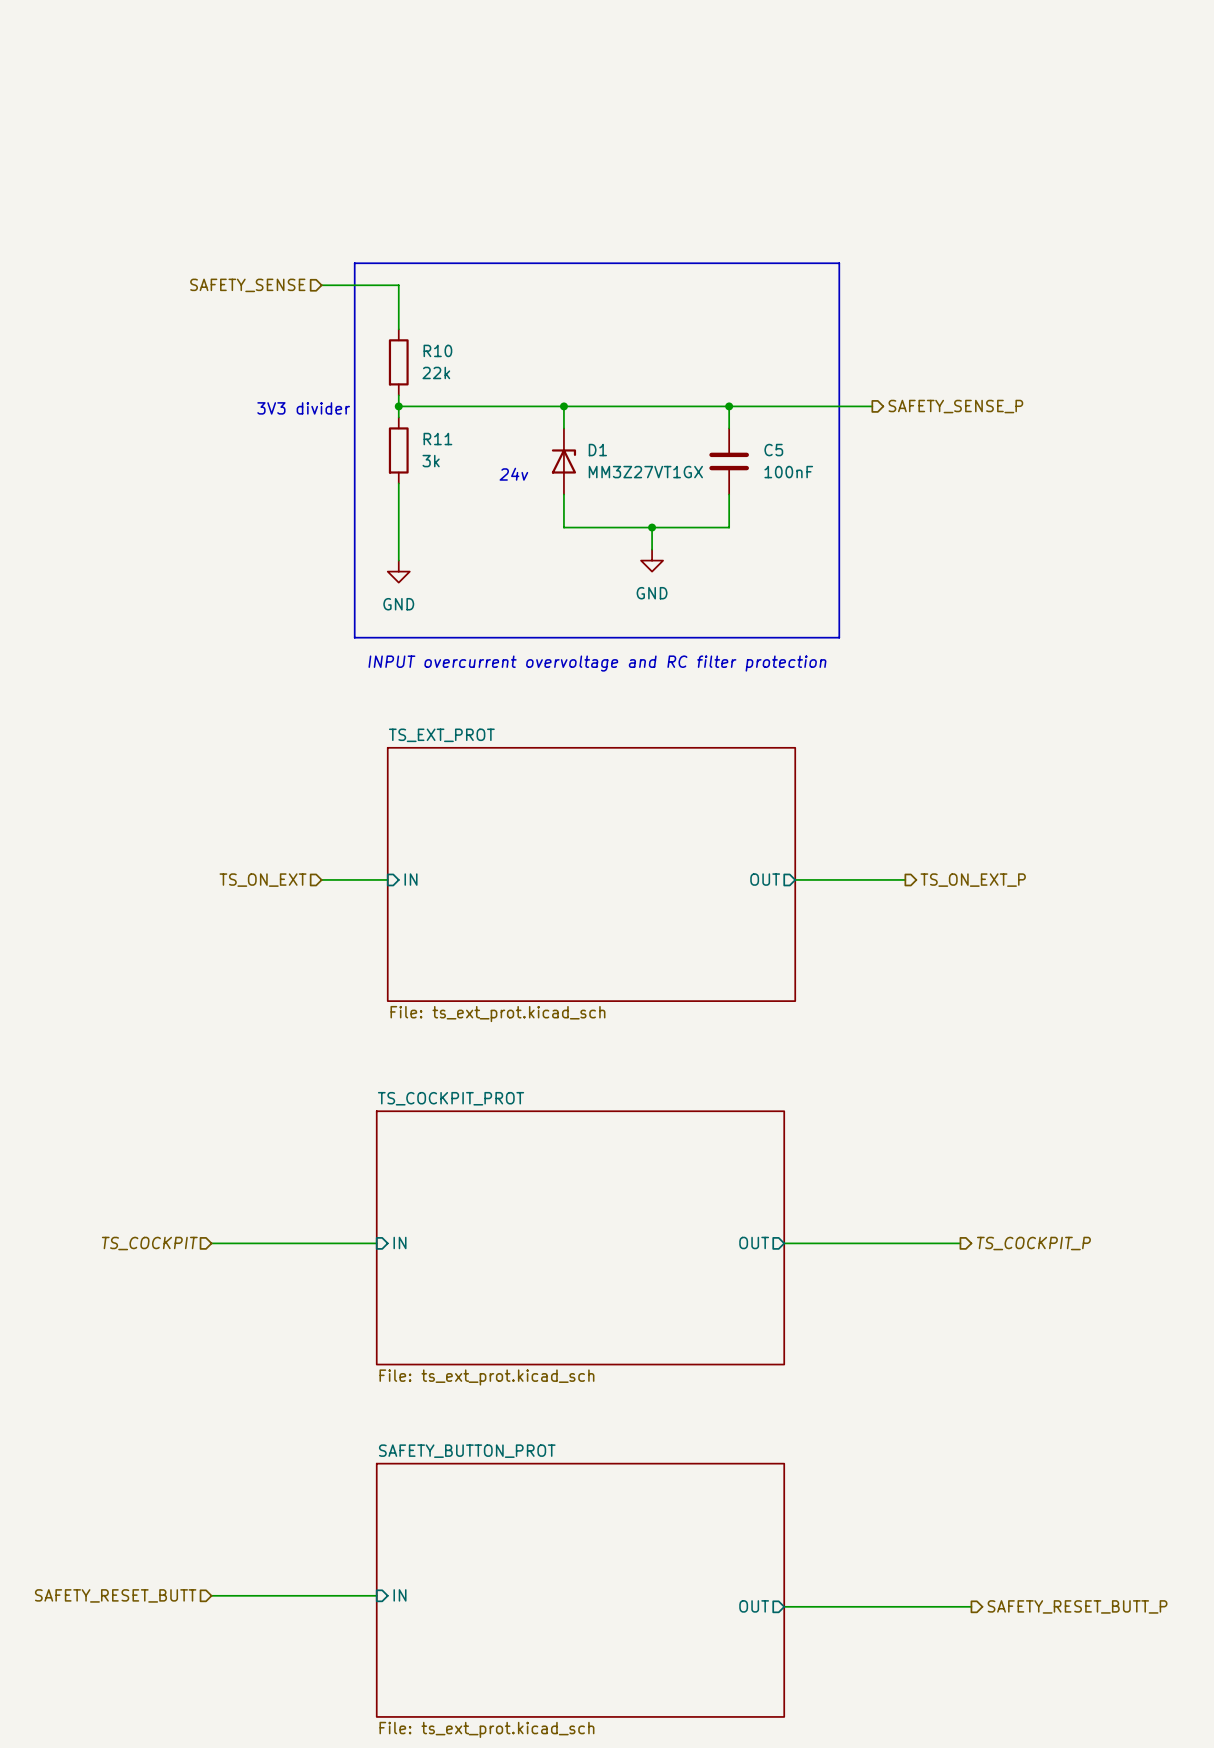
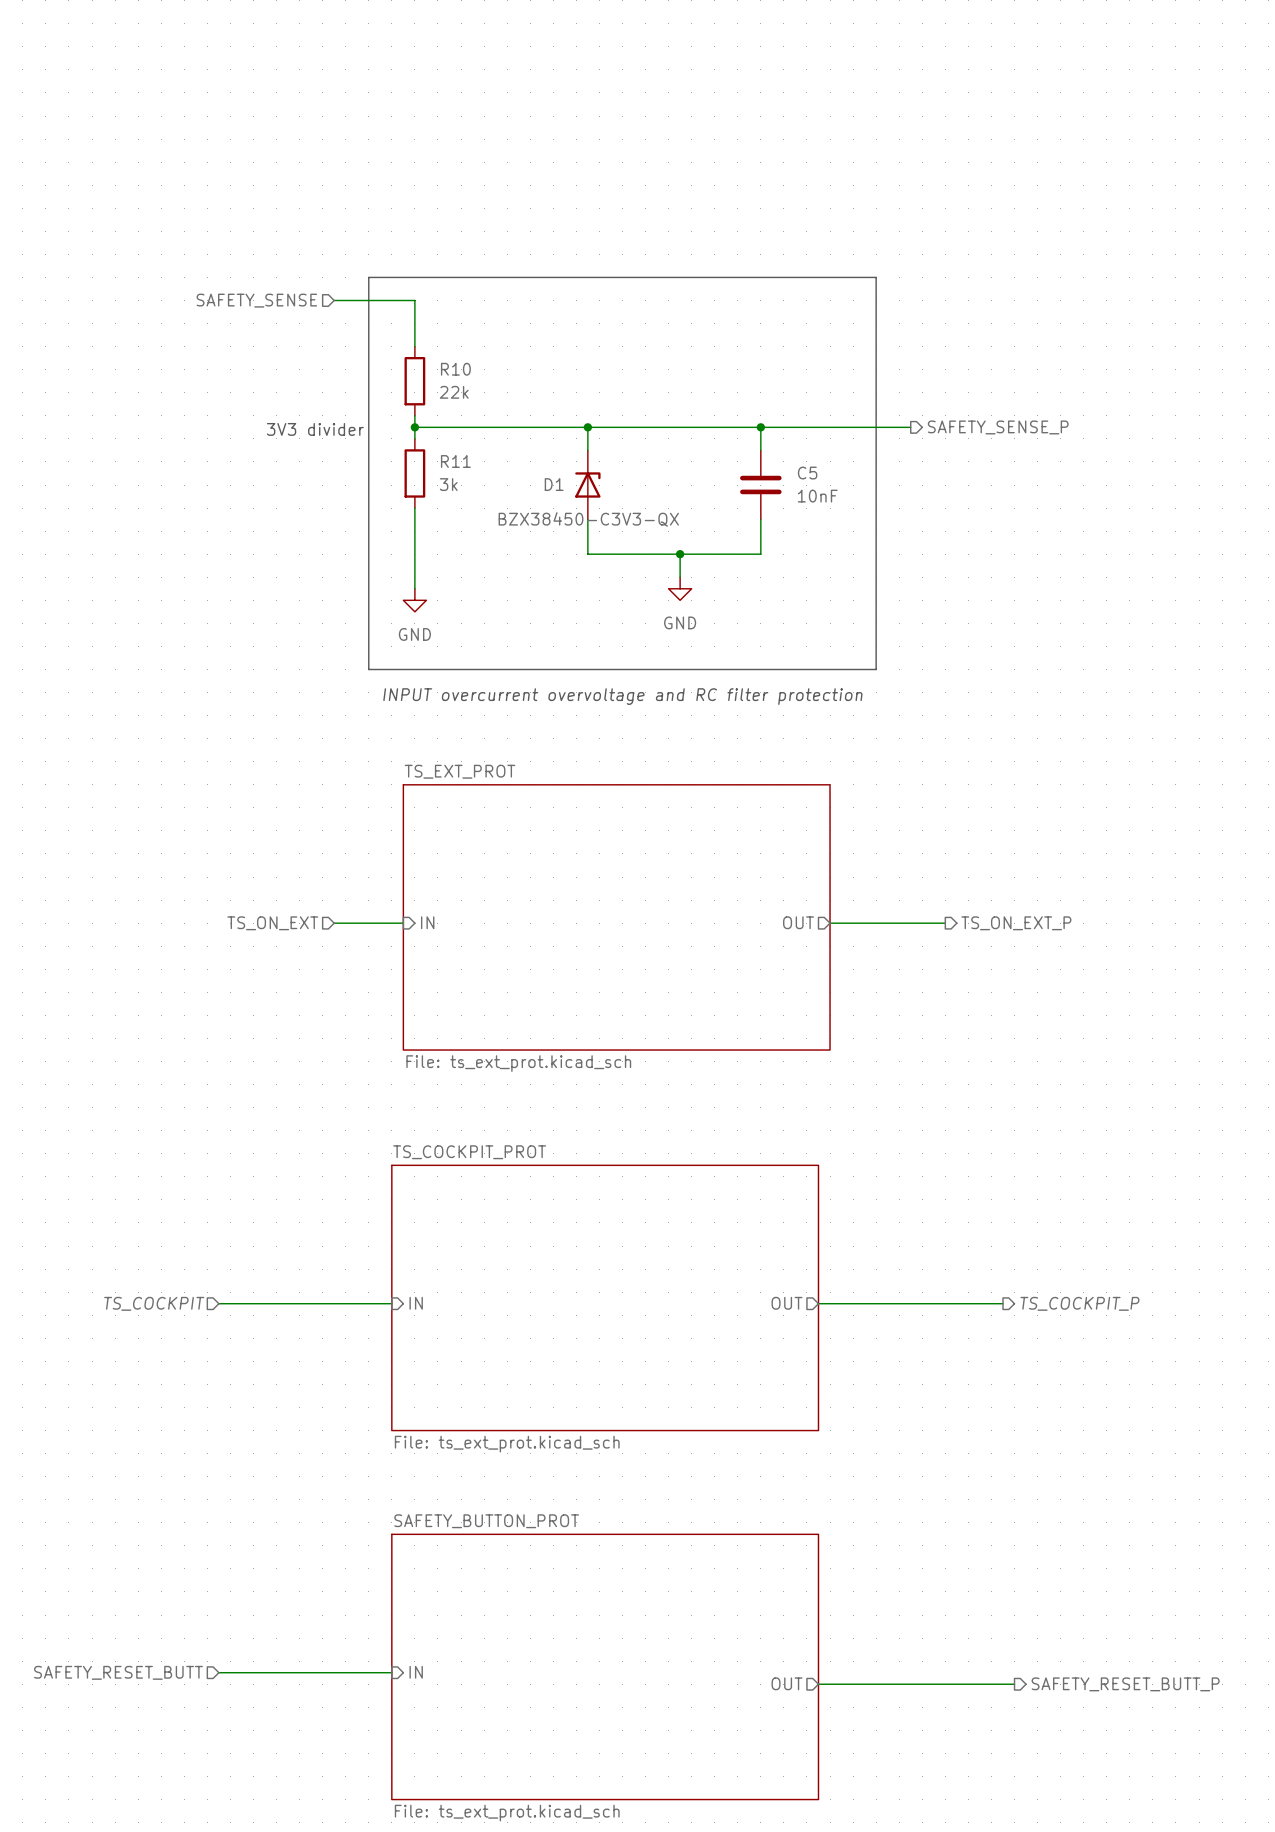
D1 name position: D1 (597, 450) -> D1 (554, 484)
D1 value: MM3Z27VT1GX (645, 472) -> BZX38450-C3V3-QX (588, 519)
C5 value: 100nF (788, 472) -> 10nF (817, 496)
text: 24v (513, 474) -> none

